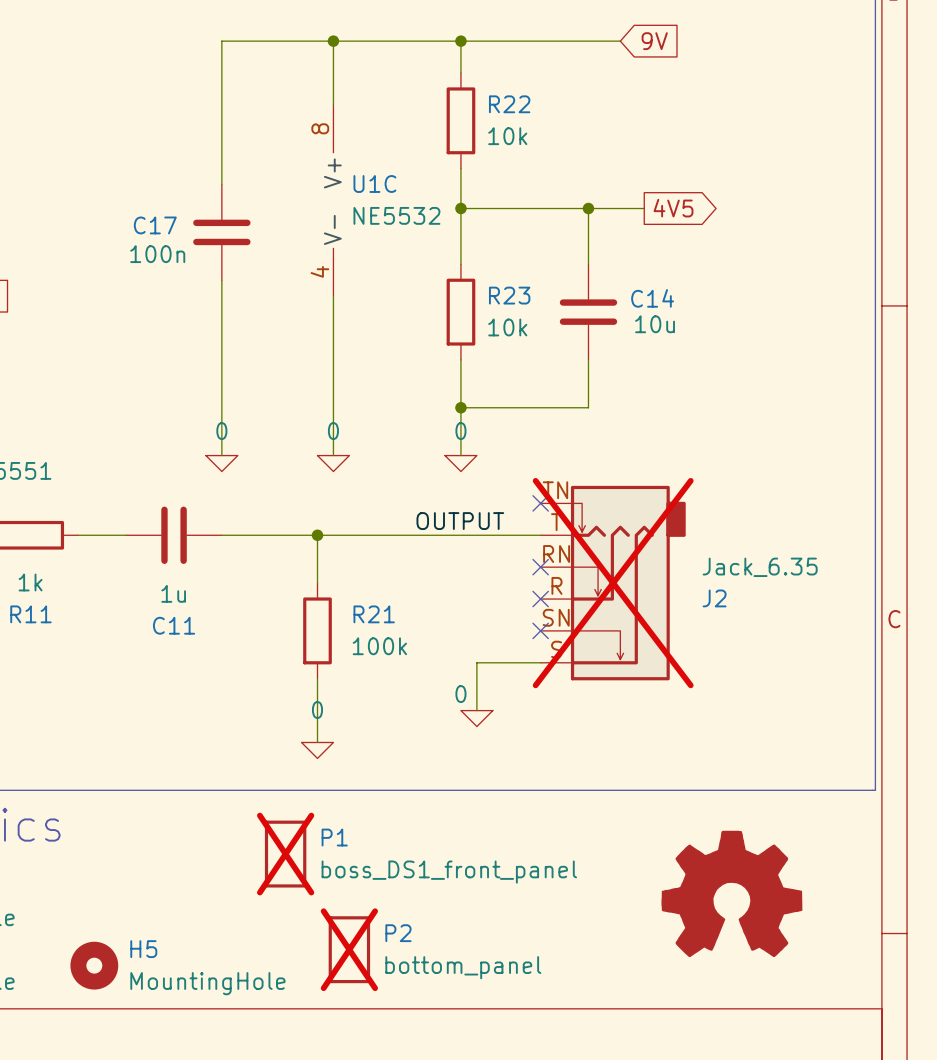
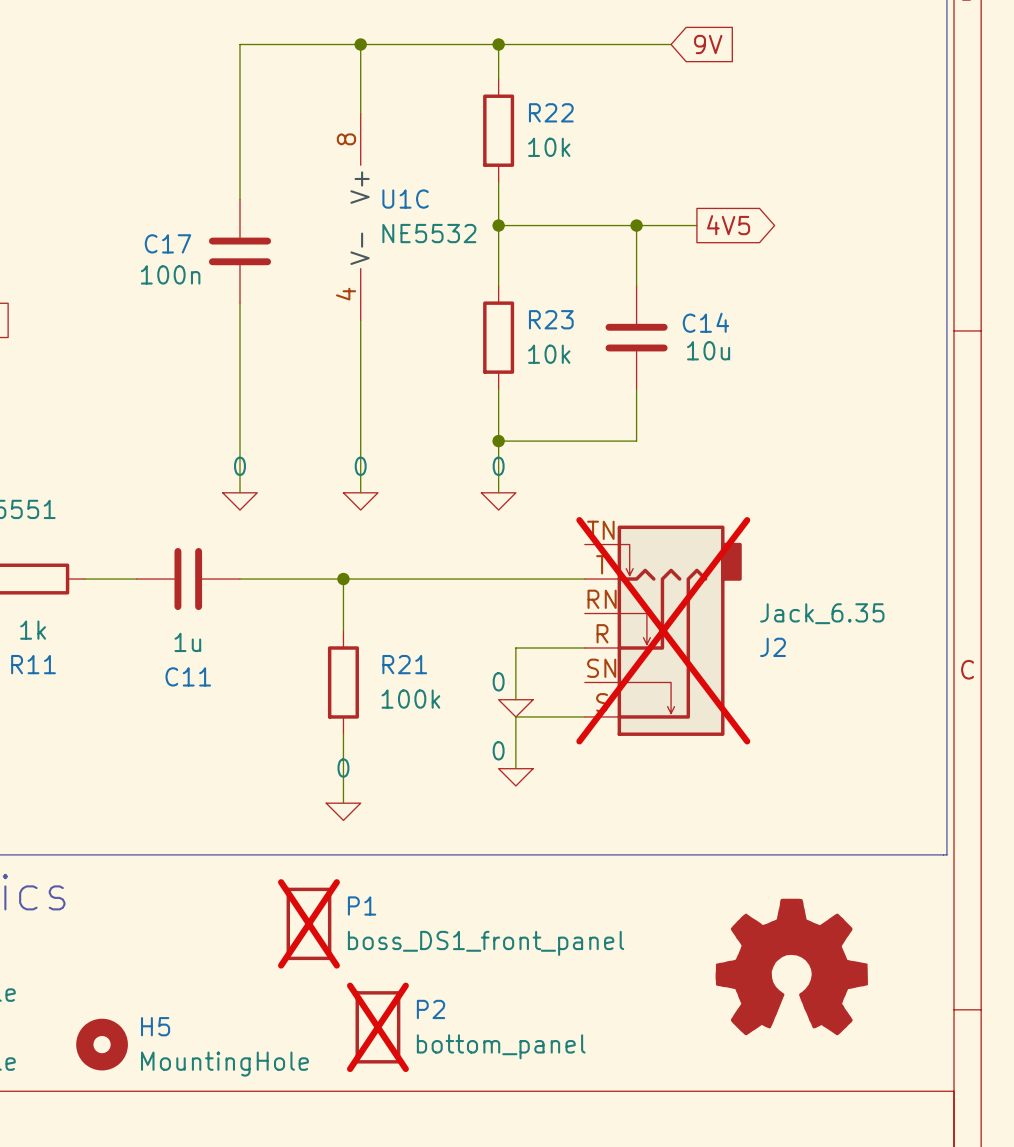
no-connect mark: (540, 503) -> none
label: OUTPUT (460, 521) -> none
no-connect mark: (540, 567) -> none
wire: none -> (584, 648) (515, 648) (515, 699)
no-connect mark: (540, 599) -> none
no-connect mark: (540, 630) -> none
power symbol: none -> 0 (515, 708)

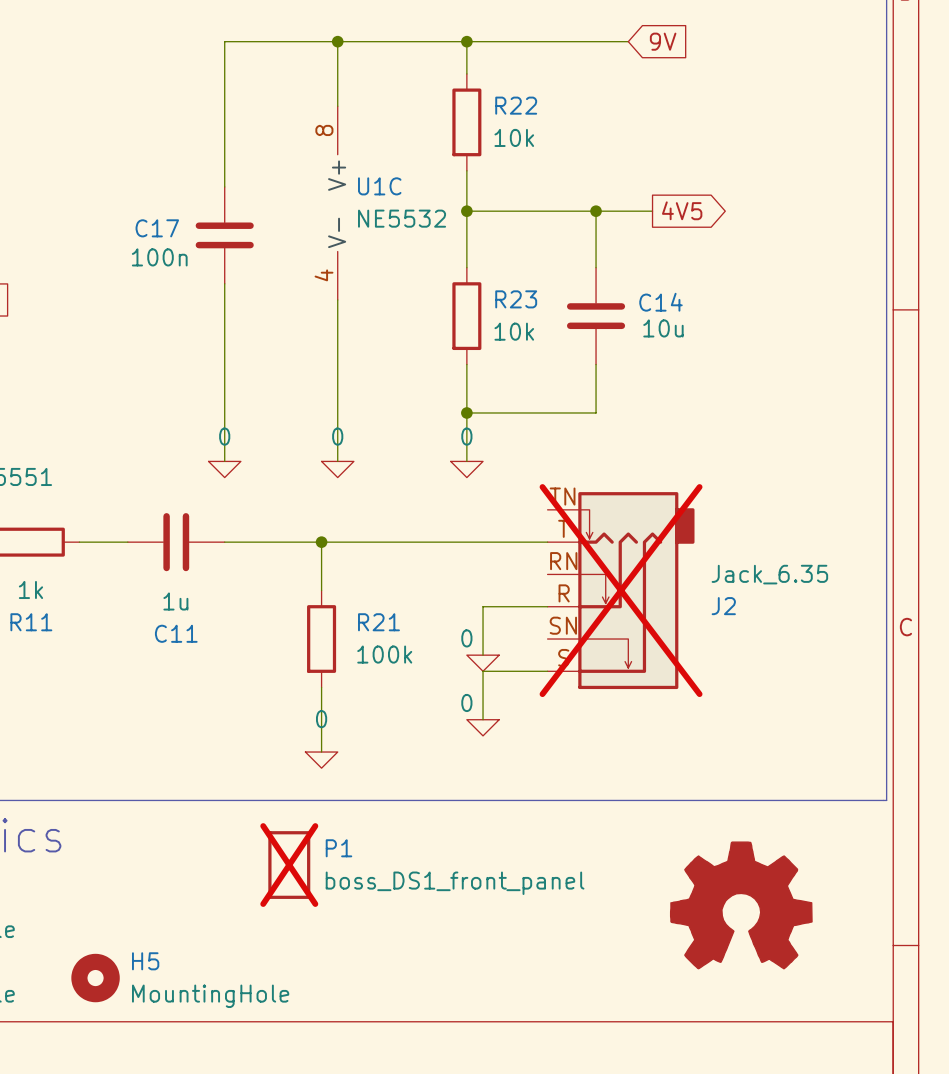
P2: bottom_panel (377, 1027) -> none

